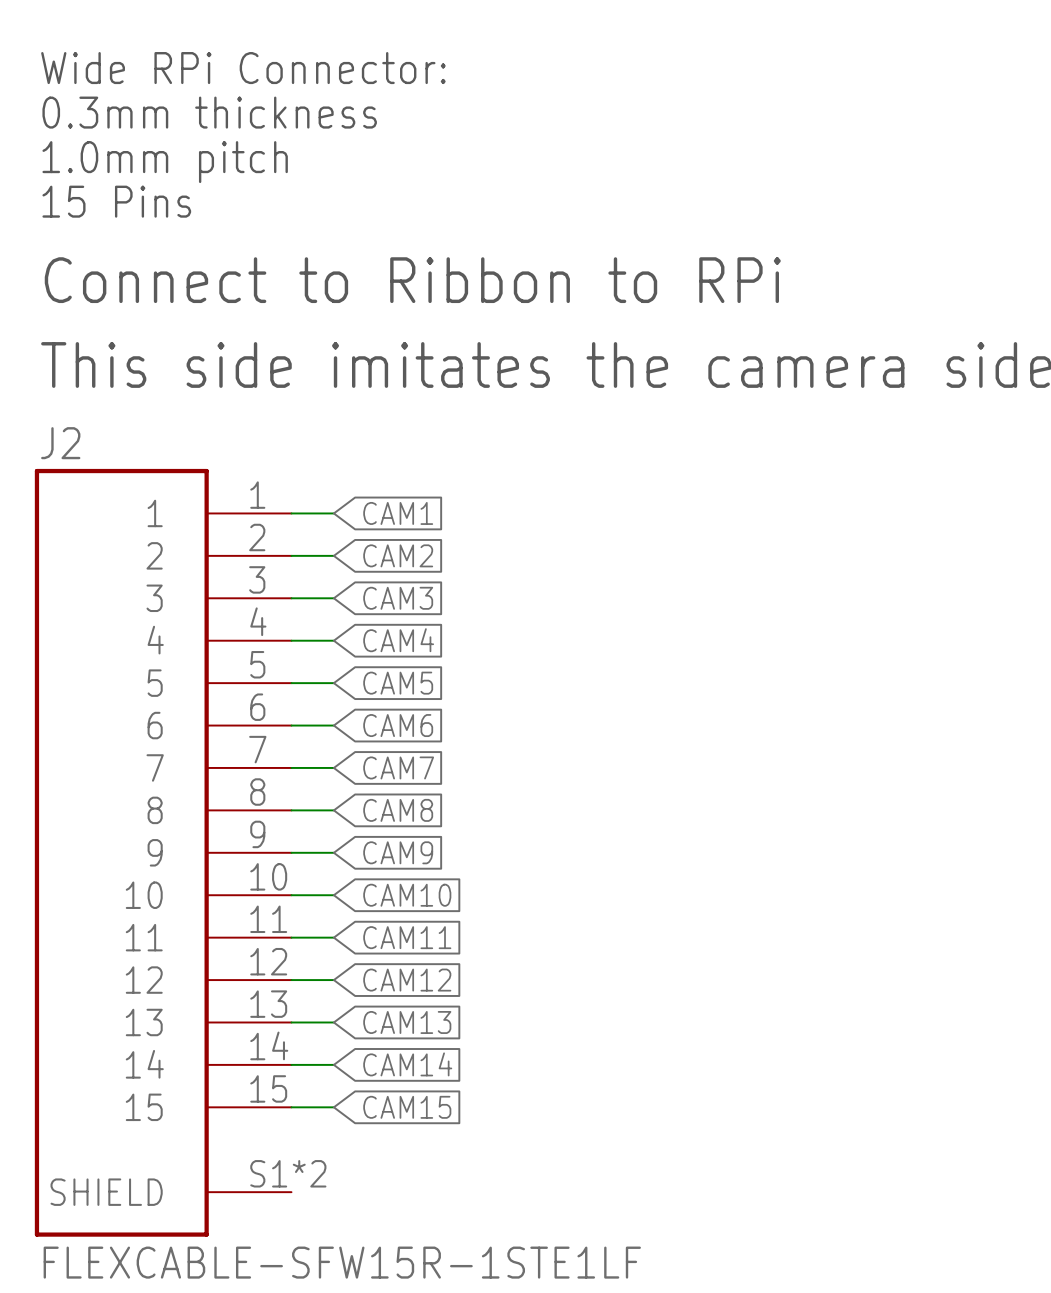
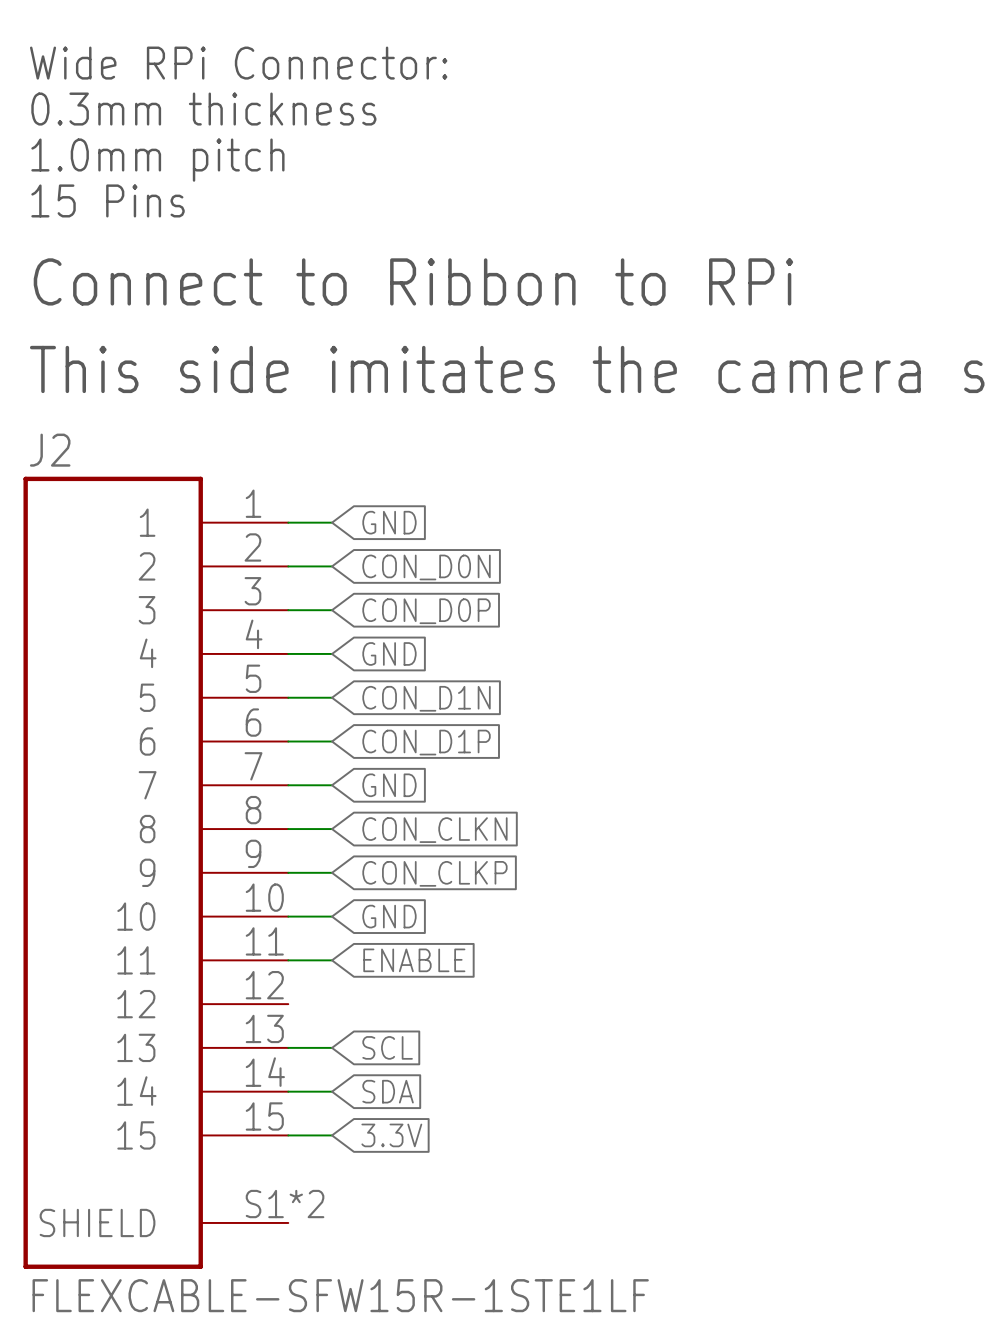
global label: CAM1 (398, 513) -> GND (389, 522)
global label: CAM2 (398, 555) -> CON_D0N (426, 567)
global label: CAM3 (398, 598) -> CON_D0P (426, 611)
global label: CAM4 (398, 640) -> GND (389, 653)
global label: CAM5 (398, 683) -> CON_D1N (426, 698)
global label: CAM6 (398, 725) -> CON_D1P (426, 742)
global label: CAM7 (398, 767) -> GND (389, 785)
global label: CAM8 (398, 810) -> CON_CLKN (434, 830)
global label: CAM9 (398, 852) -> CON_CLKP (434, 873)
global label: CAM10 (407, 895) -> GND (389, 916)
global label: CAM11 (407, 937) -> ENABLE (414, 960)
wire: (291, 980) (333, 980) -> none
global label: CAM12 (407, 980) -> none
global label: CAM13 (407, 1022) -> SCL (387, 1047)
global label: CAM14 (407, 1064) -> SDA (388, 1091)
global label: CAM15 (407, 1107) -> 3.3V (391, 1135)

